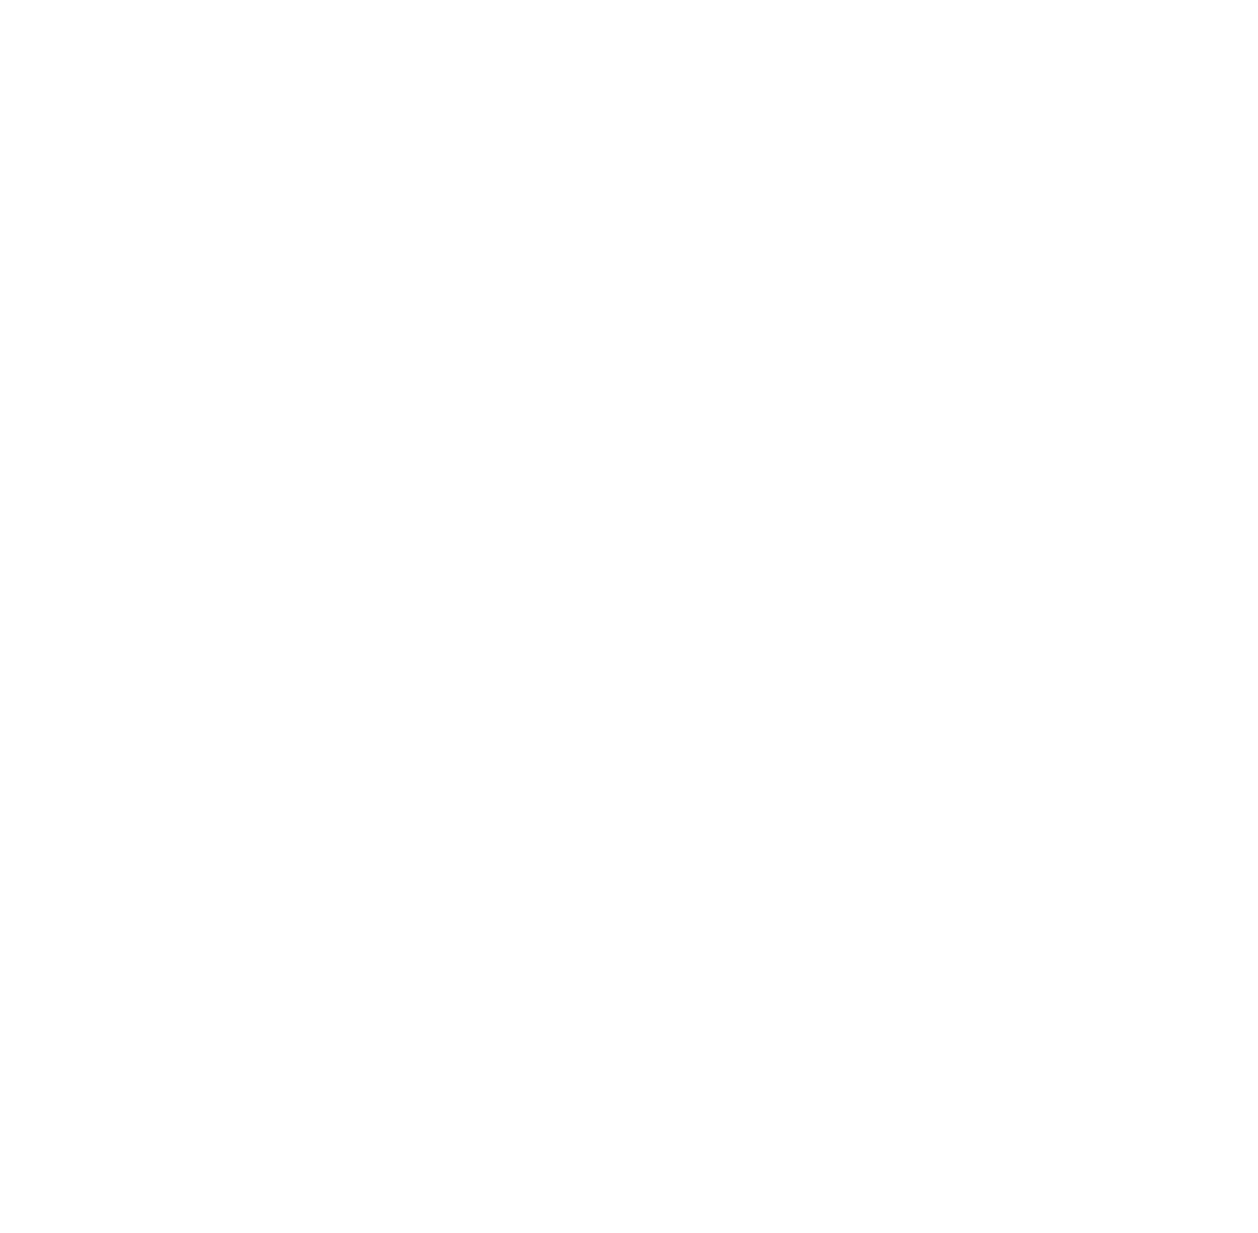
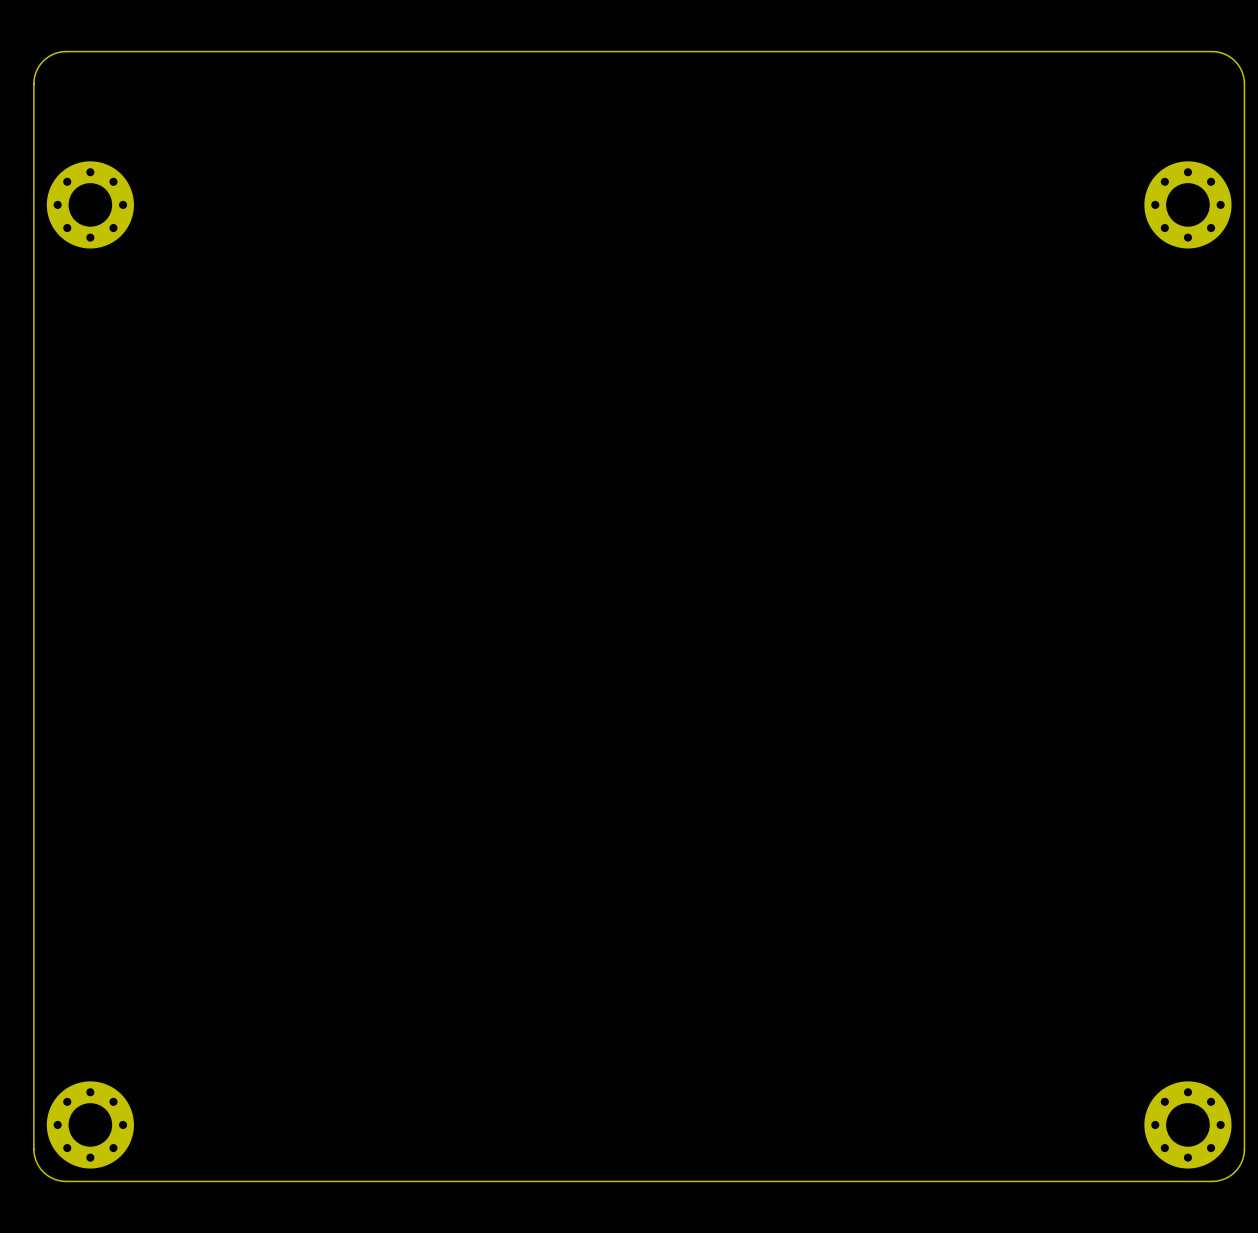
board edge: none -> (66, 51) (1212, 51) (1226, 54) (1234, 61) (1241, 69) (1244, 83) (1244, 1149) (1241, 1163) (1234, 1171) (1222, 1179) (1212, 1181) (66, 1181) (52, 1178) (43, 1171) (37, 1163) (33, 1149) (33, 83) (35, 73) (43, 61) (52, 54) (66, 51)
part: none -> (90, 204)
part: none -> (1187, 204)
part: none -> (90, 1124)
part: none -> (1187, 1124)

